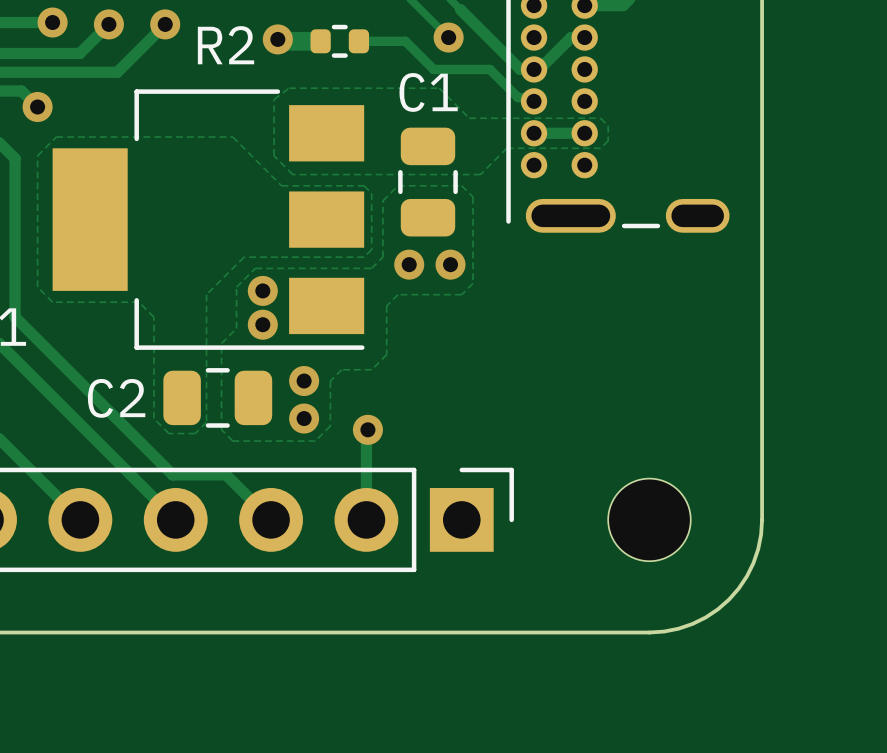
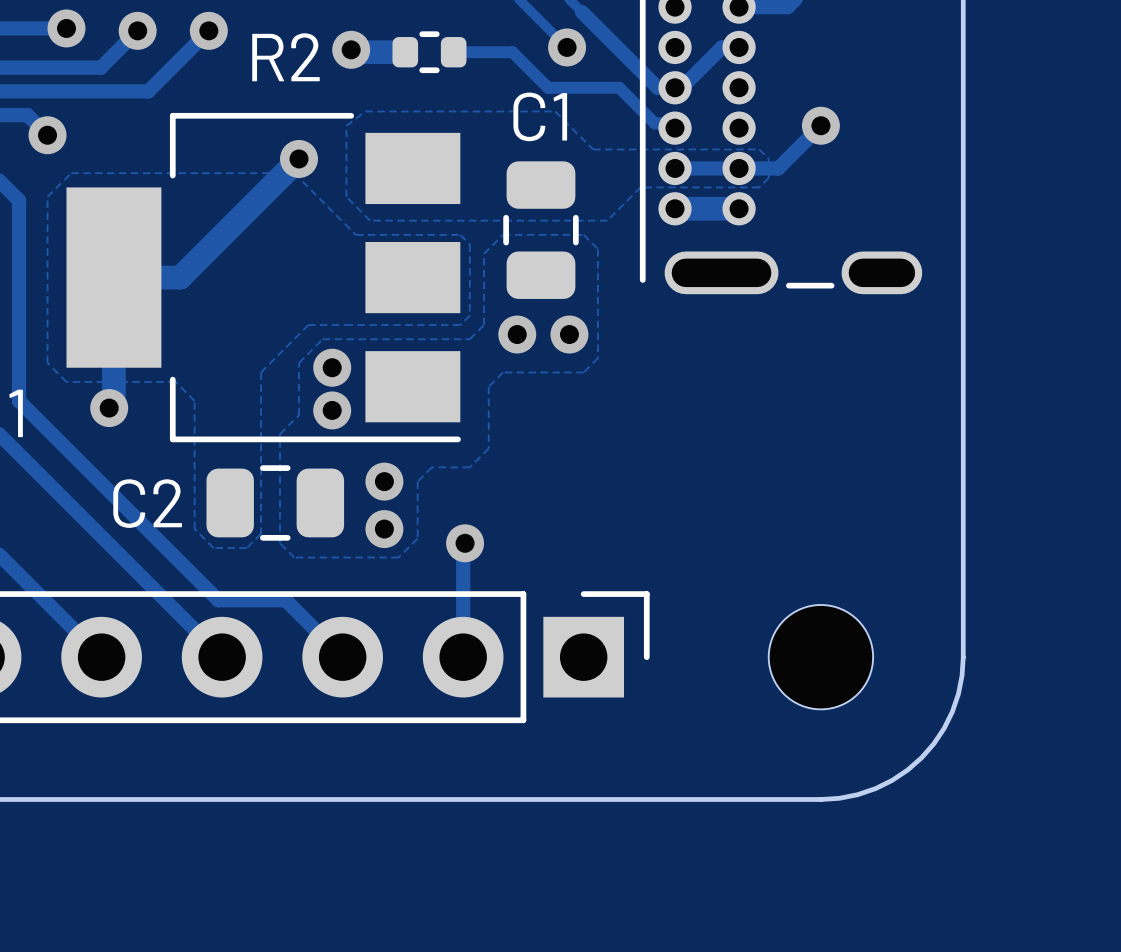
track: none -> (820, 125) (778, 168) (739, 168)
via: none -> (820, 125)
track: none -> (299, 158) (180, 277) (113, 277) (113, 403) (109, 408)
via: none -> (299, 158)
track: none -> (675, 208) (739, 208)
via: none -> (109, 408)

